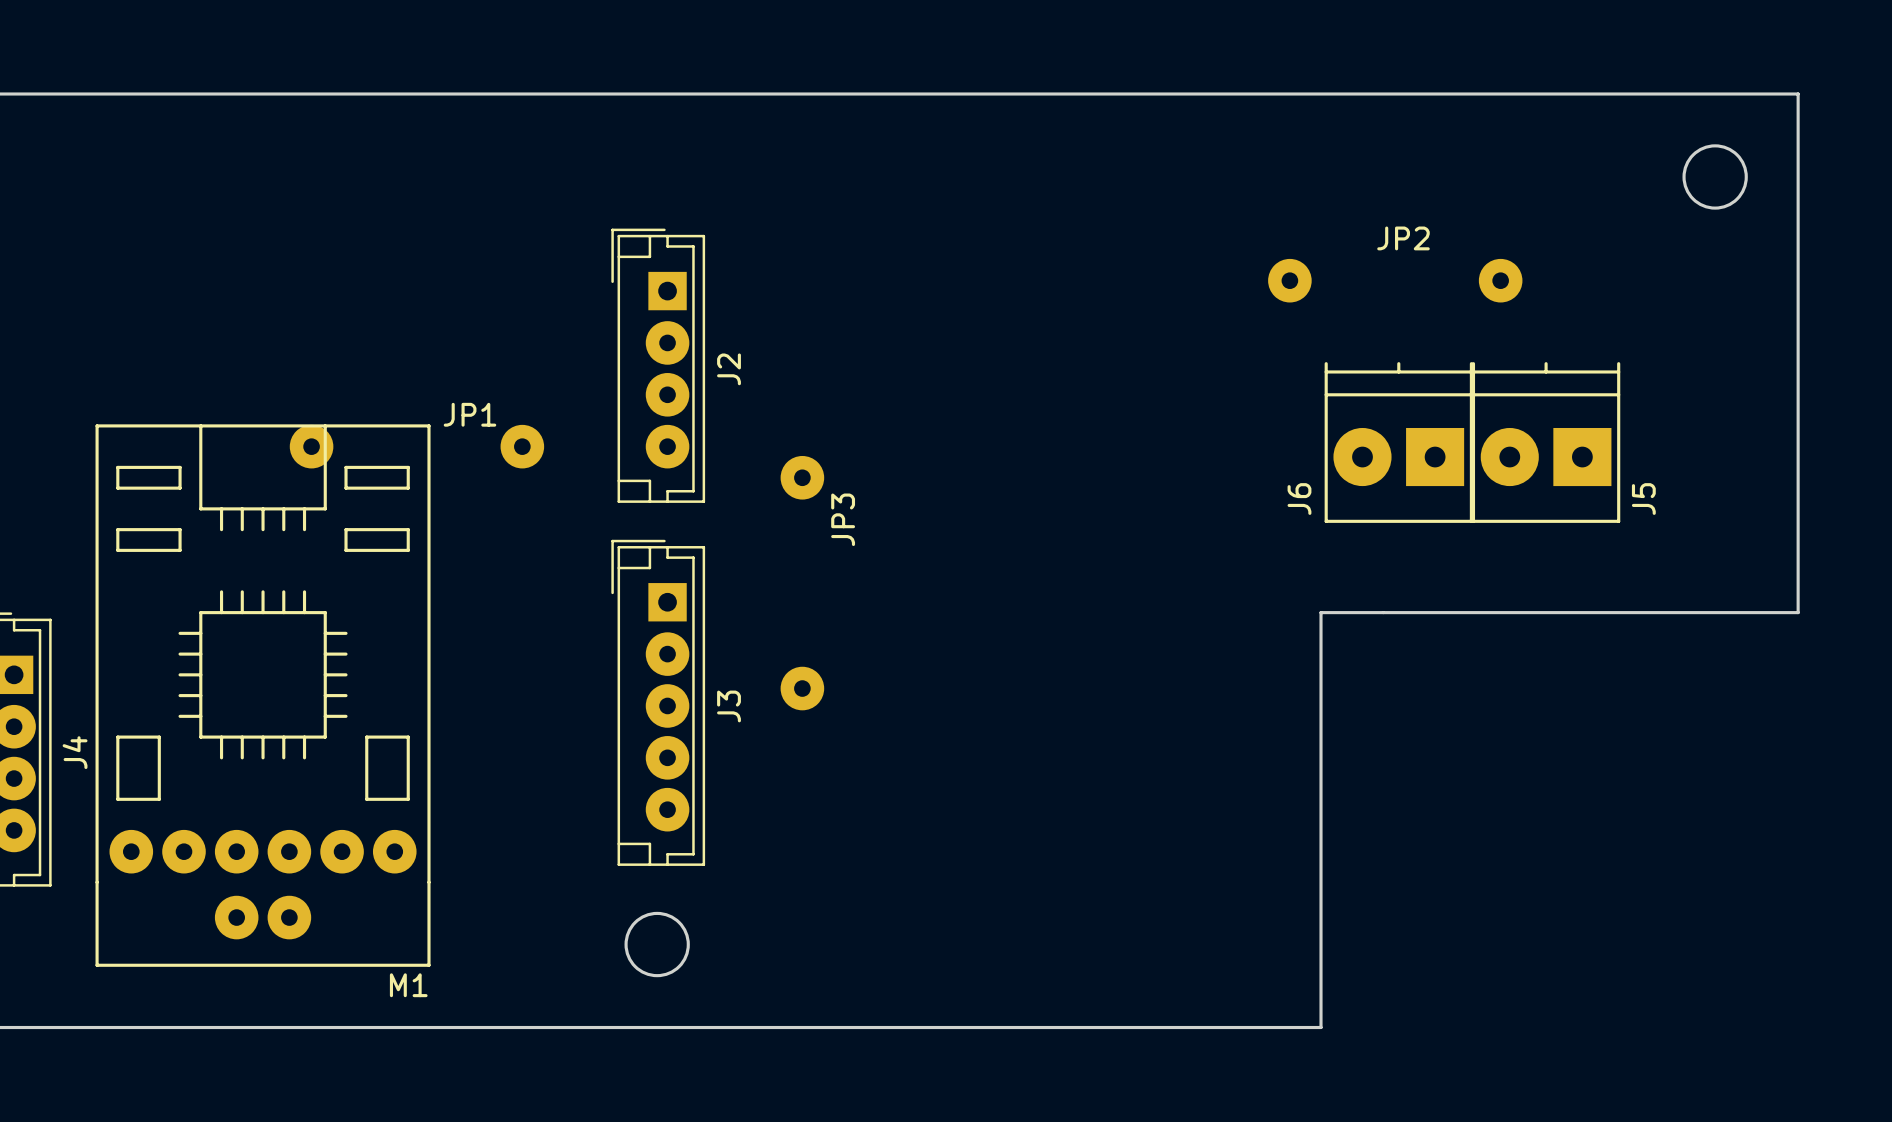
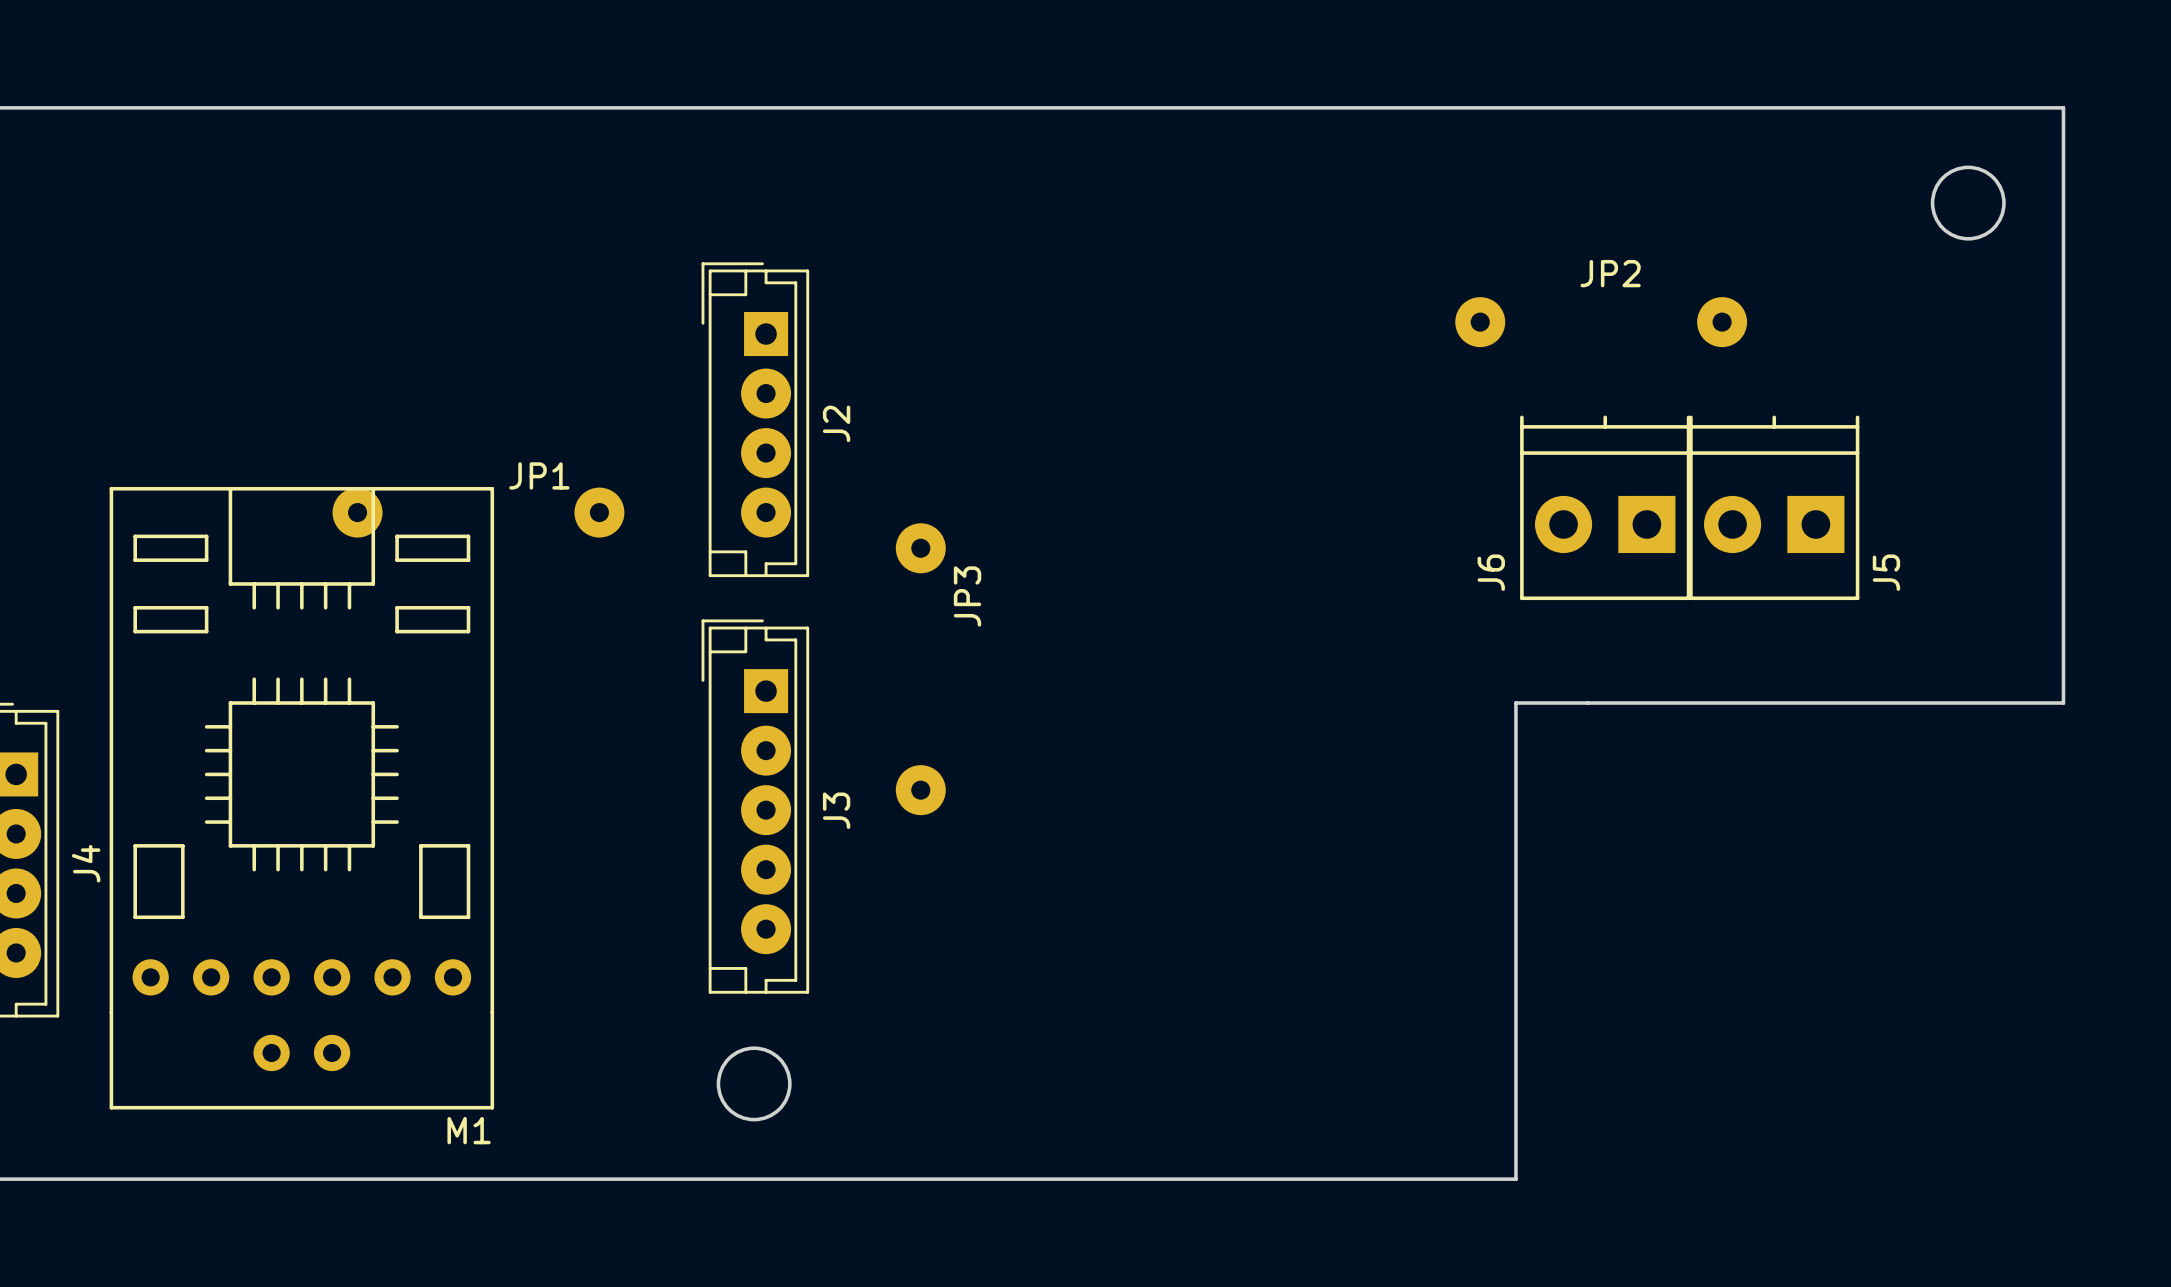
J6 footprint: [1324, 362, 1473, 523] -> [1520, 415, 1691, 601]
J5 footprint: [1471, 362, 1621, 523] -> [1689, 415, 1860, 601]
M1 footprint: [95, 424, 431, 967] -> [109, 486, 495, 1110]

